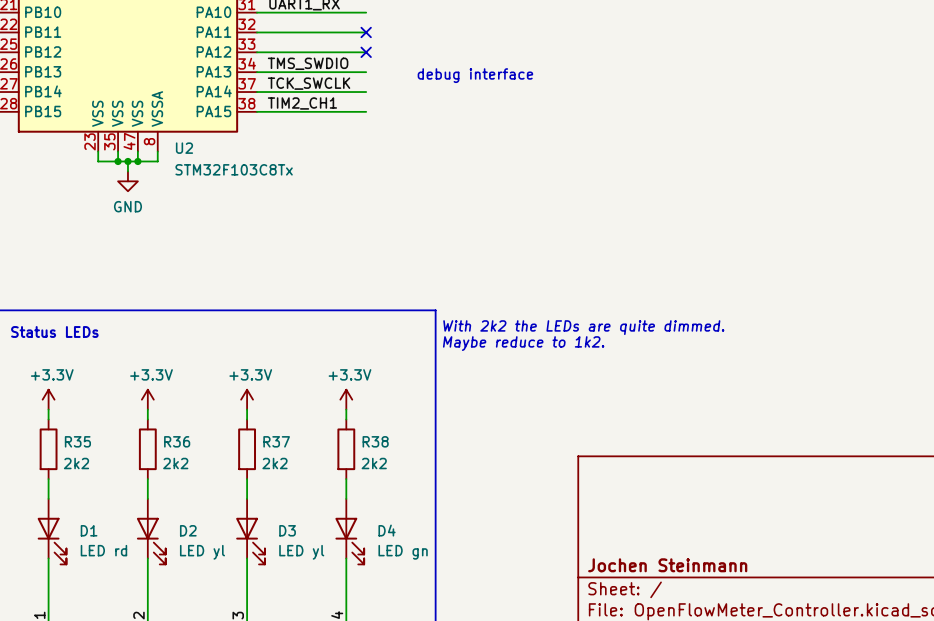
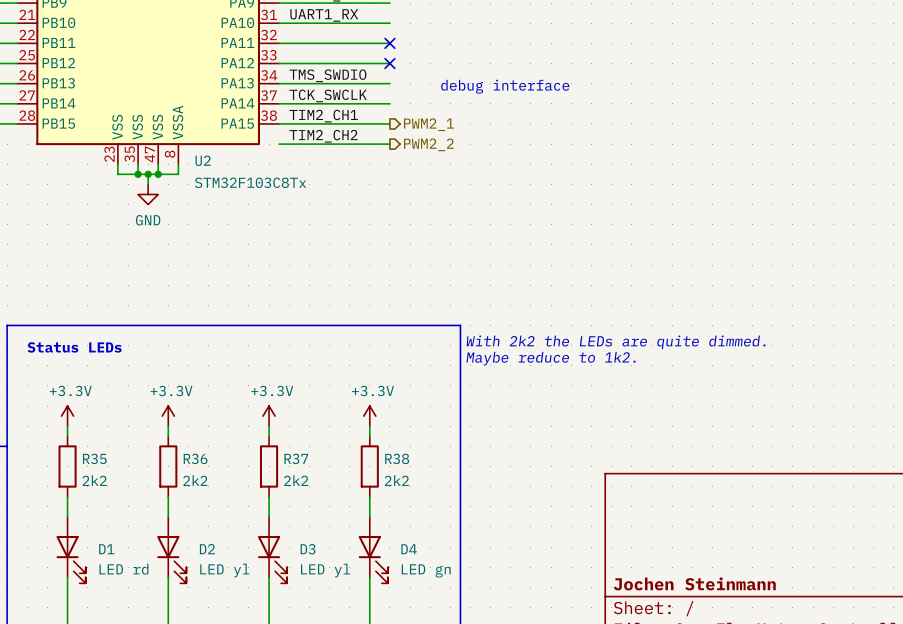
hierarchical label: none -> PWM2_1 (429, 124)
label: none -> TIM2_CH2 (323, 136)
wire: none -> (279, 144) (389, 144)
hierarchical label: none -> PWM2_2 (428, 144)

